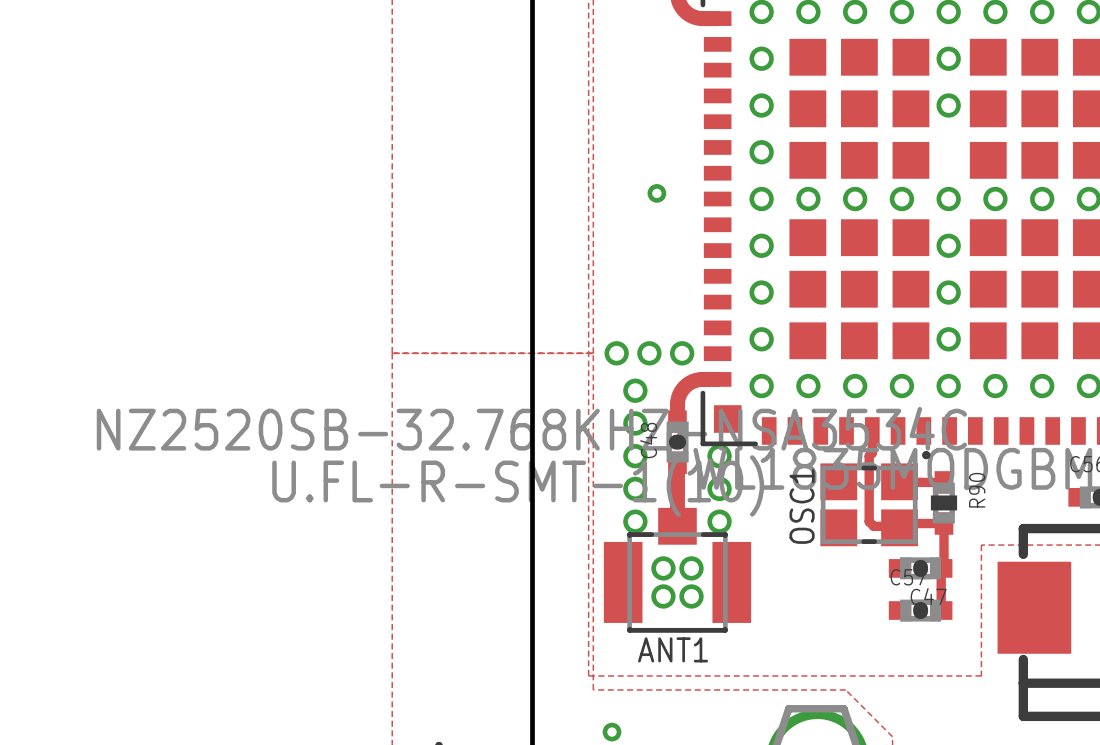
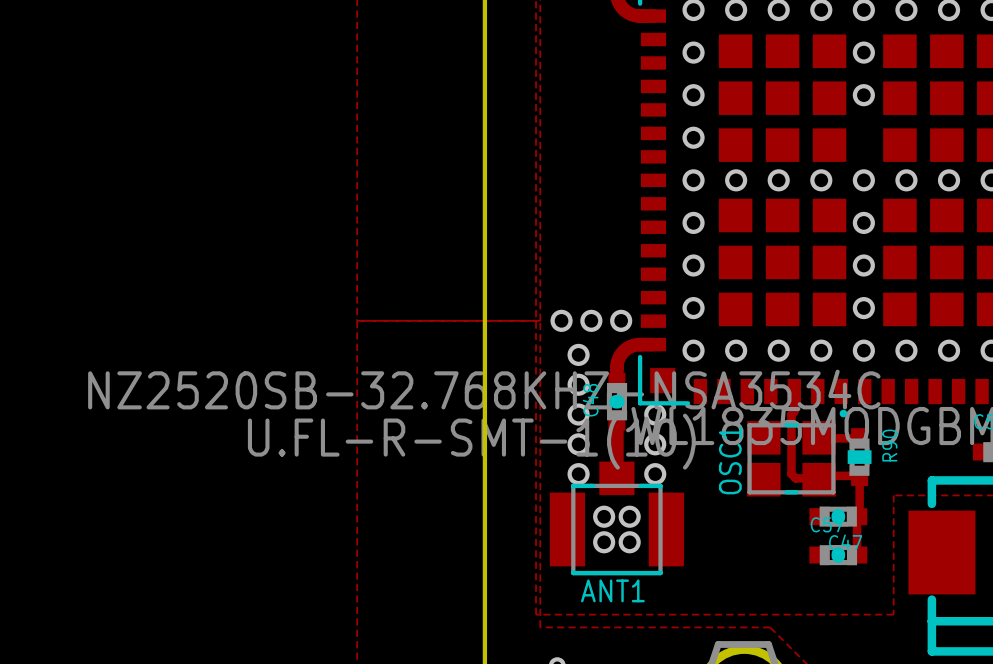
via: (656, 193) -> none

